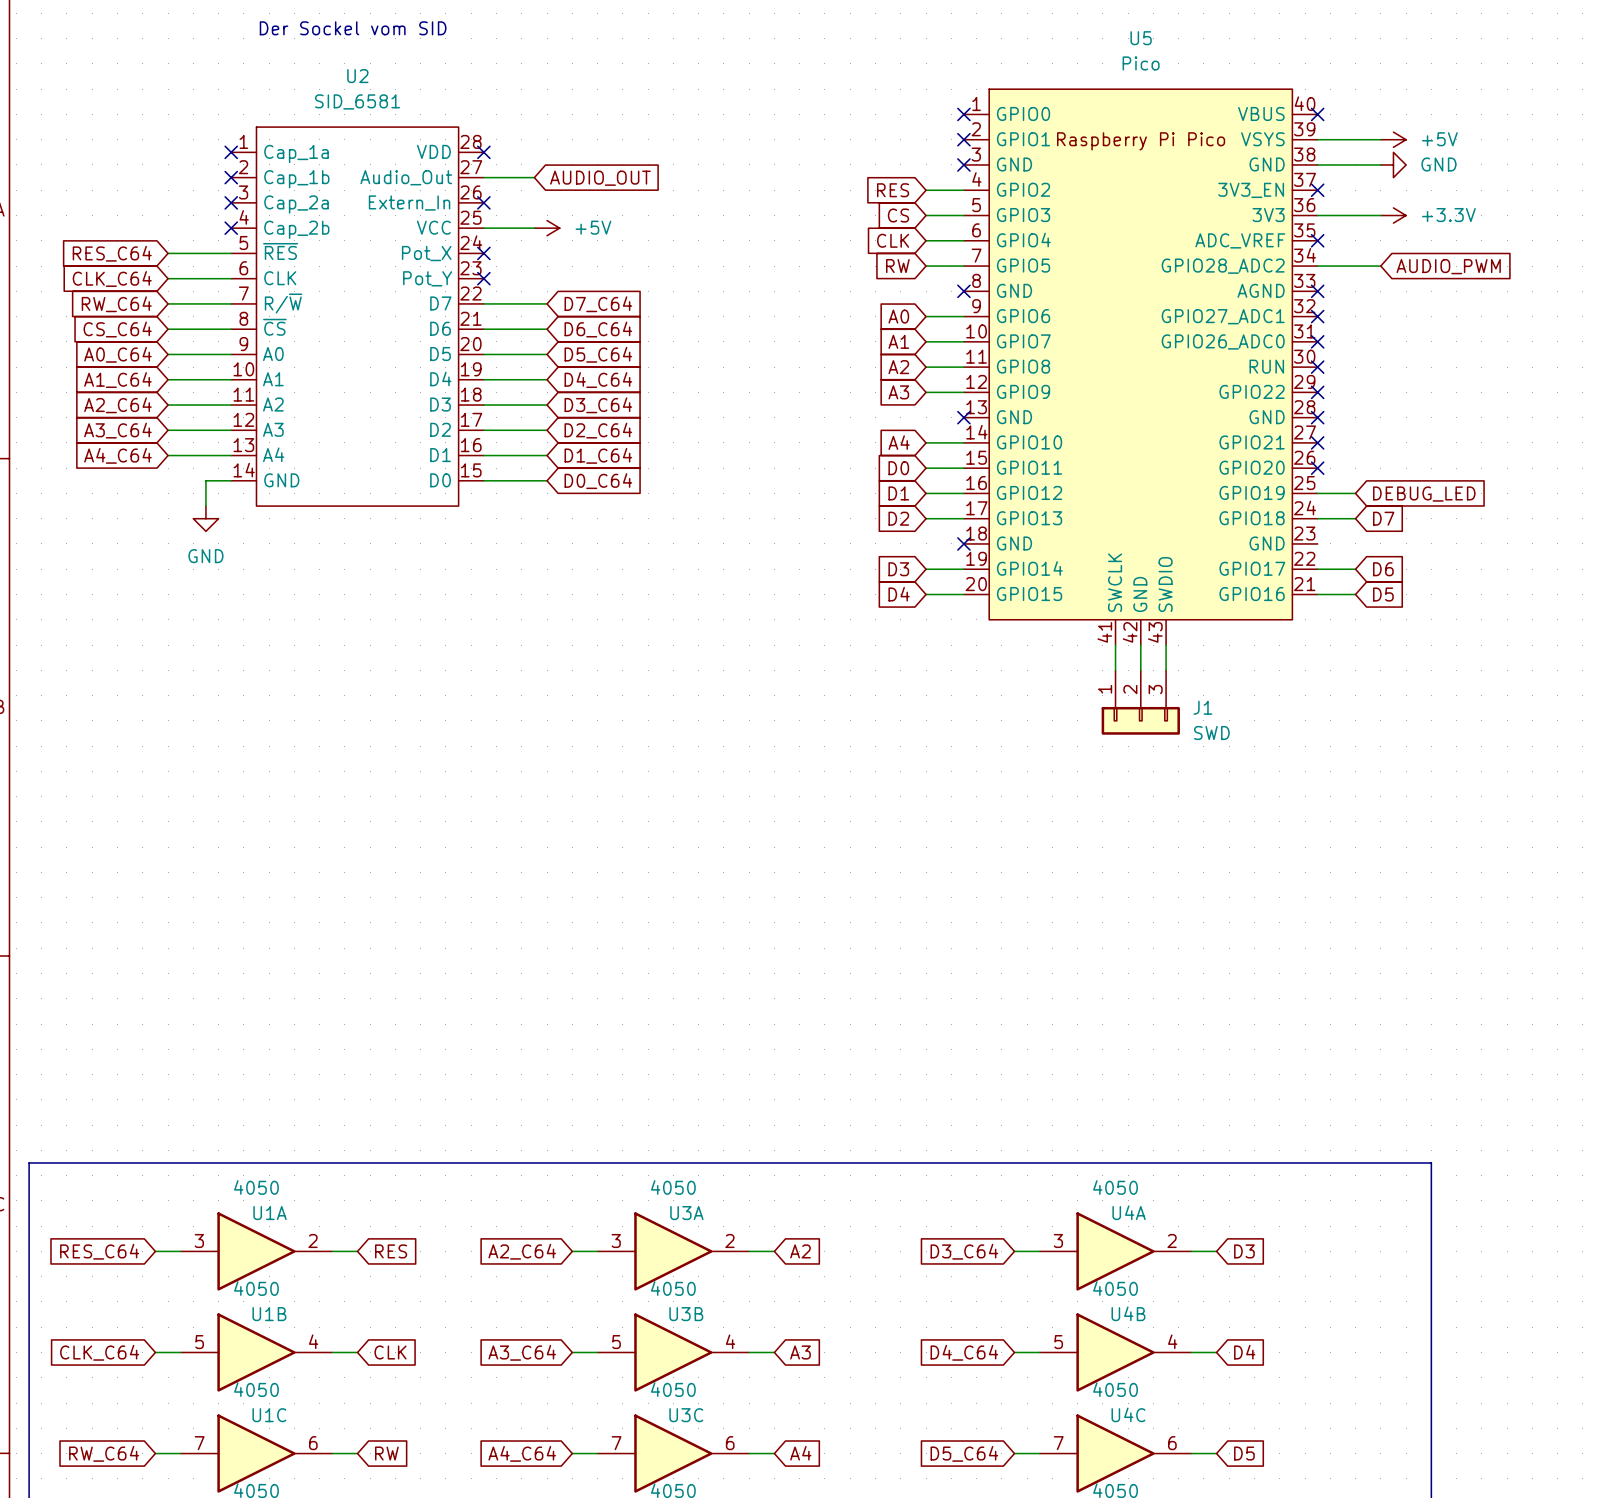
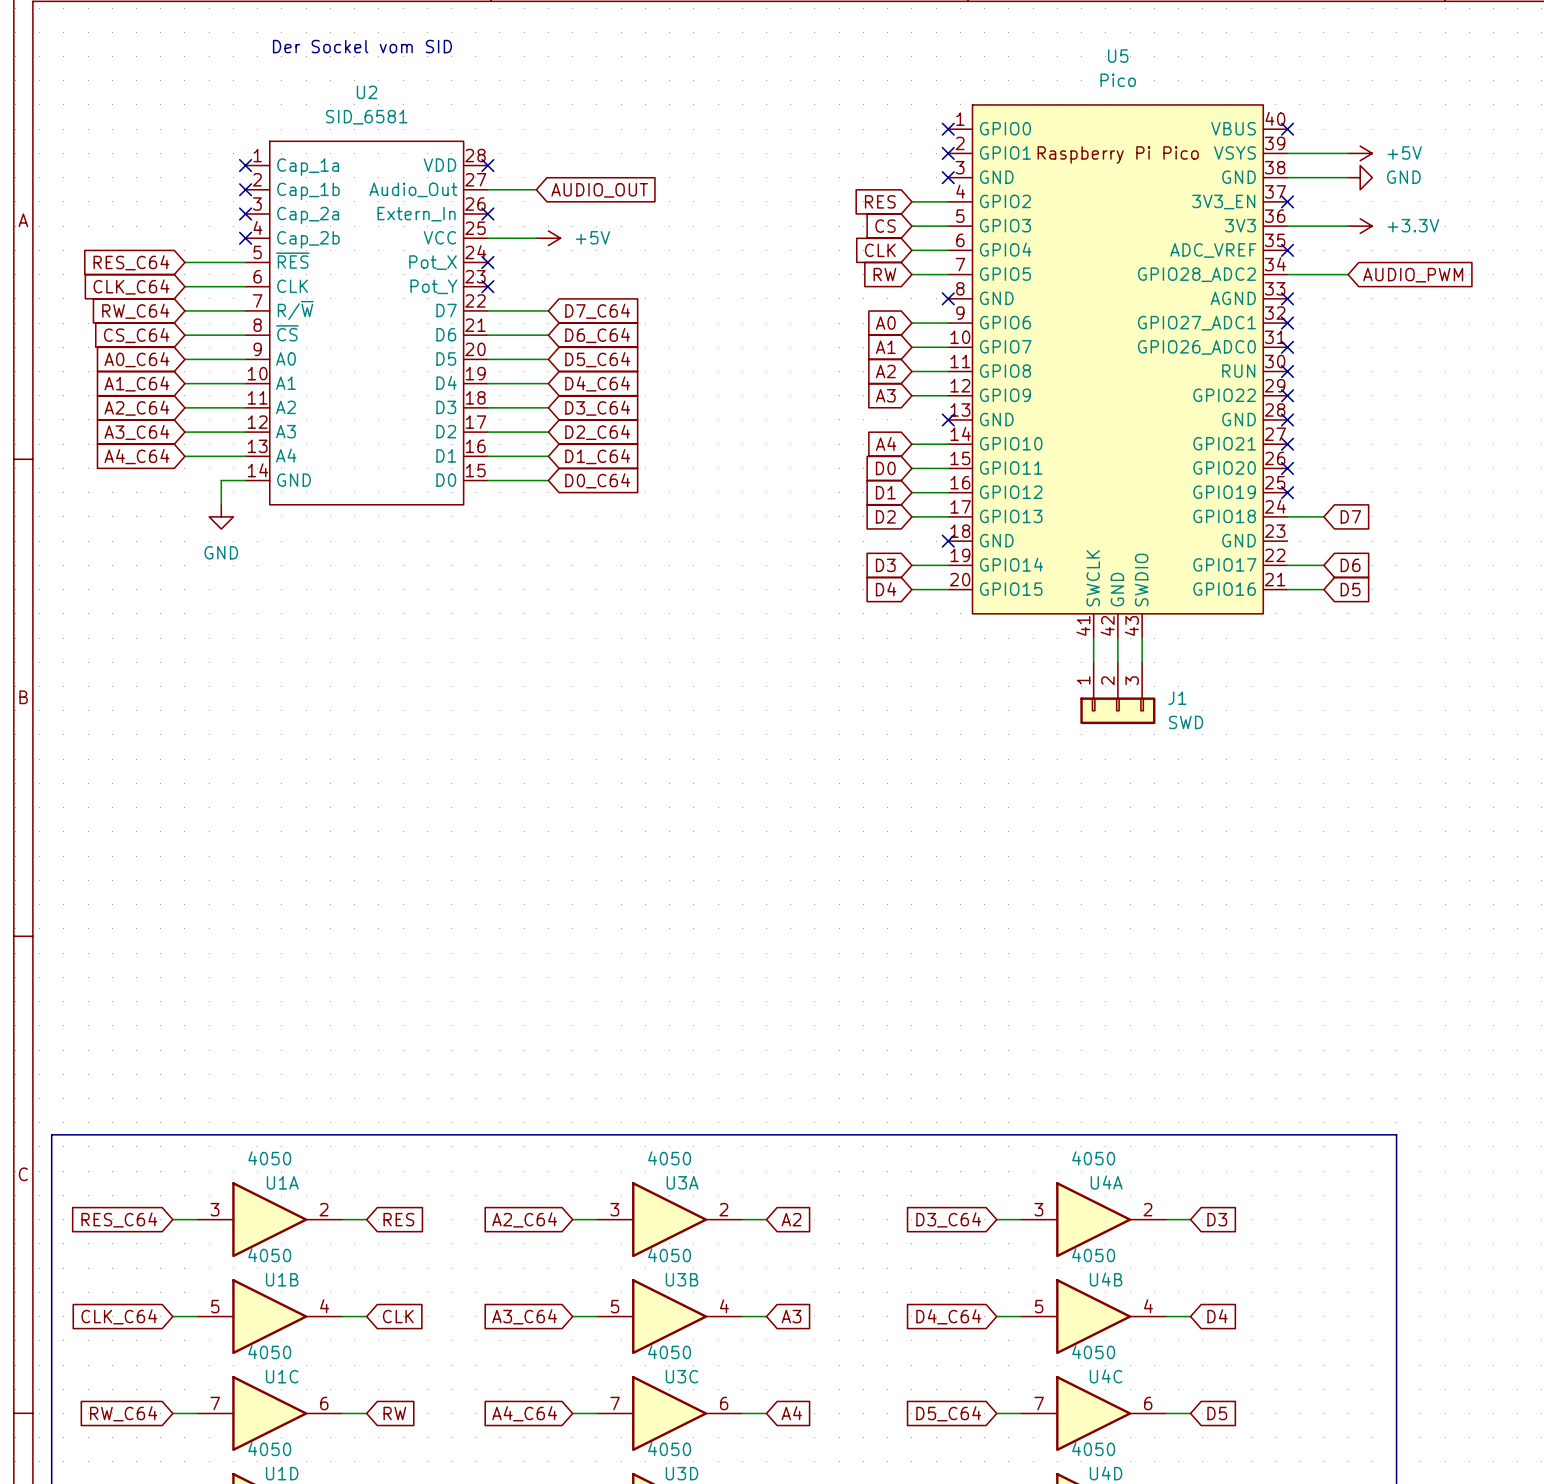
wire: (1317, 493) (1355, 493) -> none
no-connect mark: none -> (1287, 492)
global label: DEBUG_LED (1424, 494) -> none

